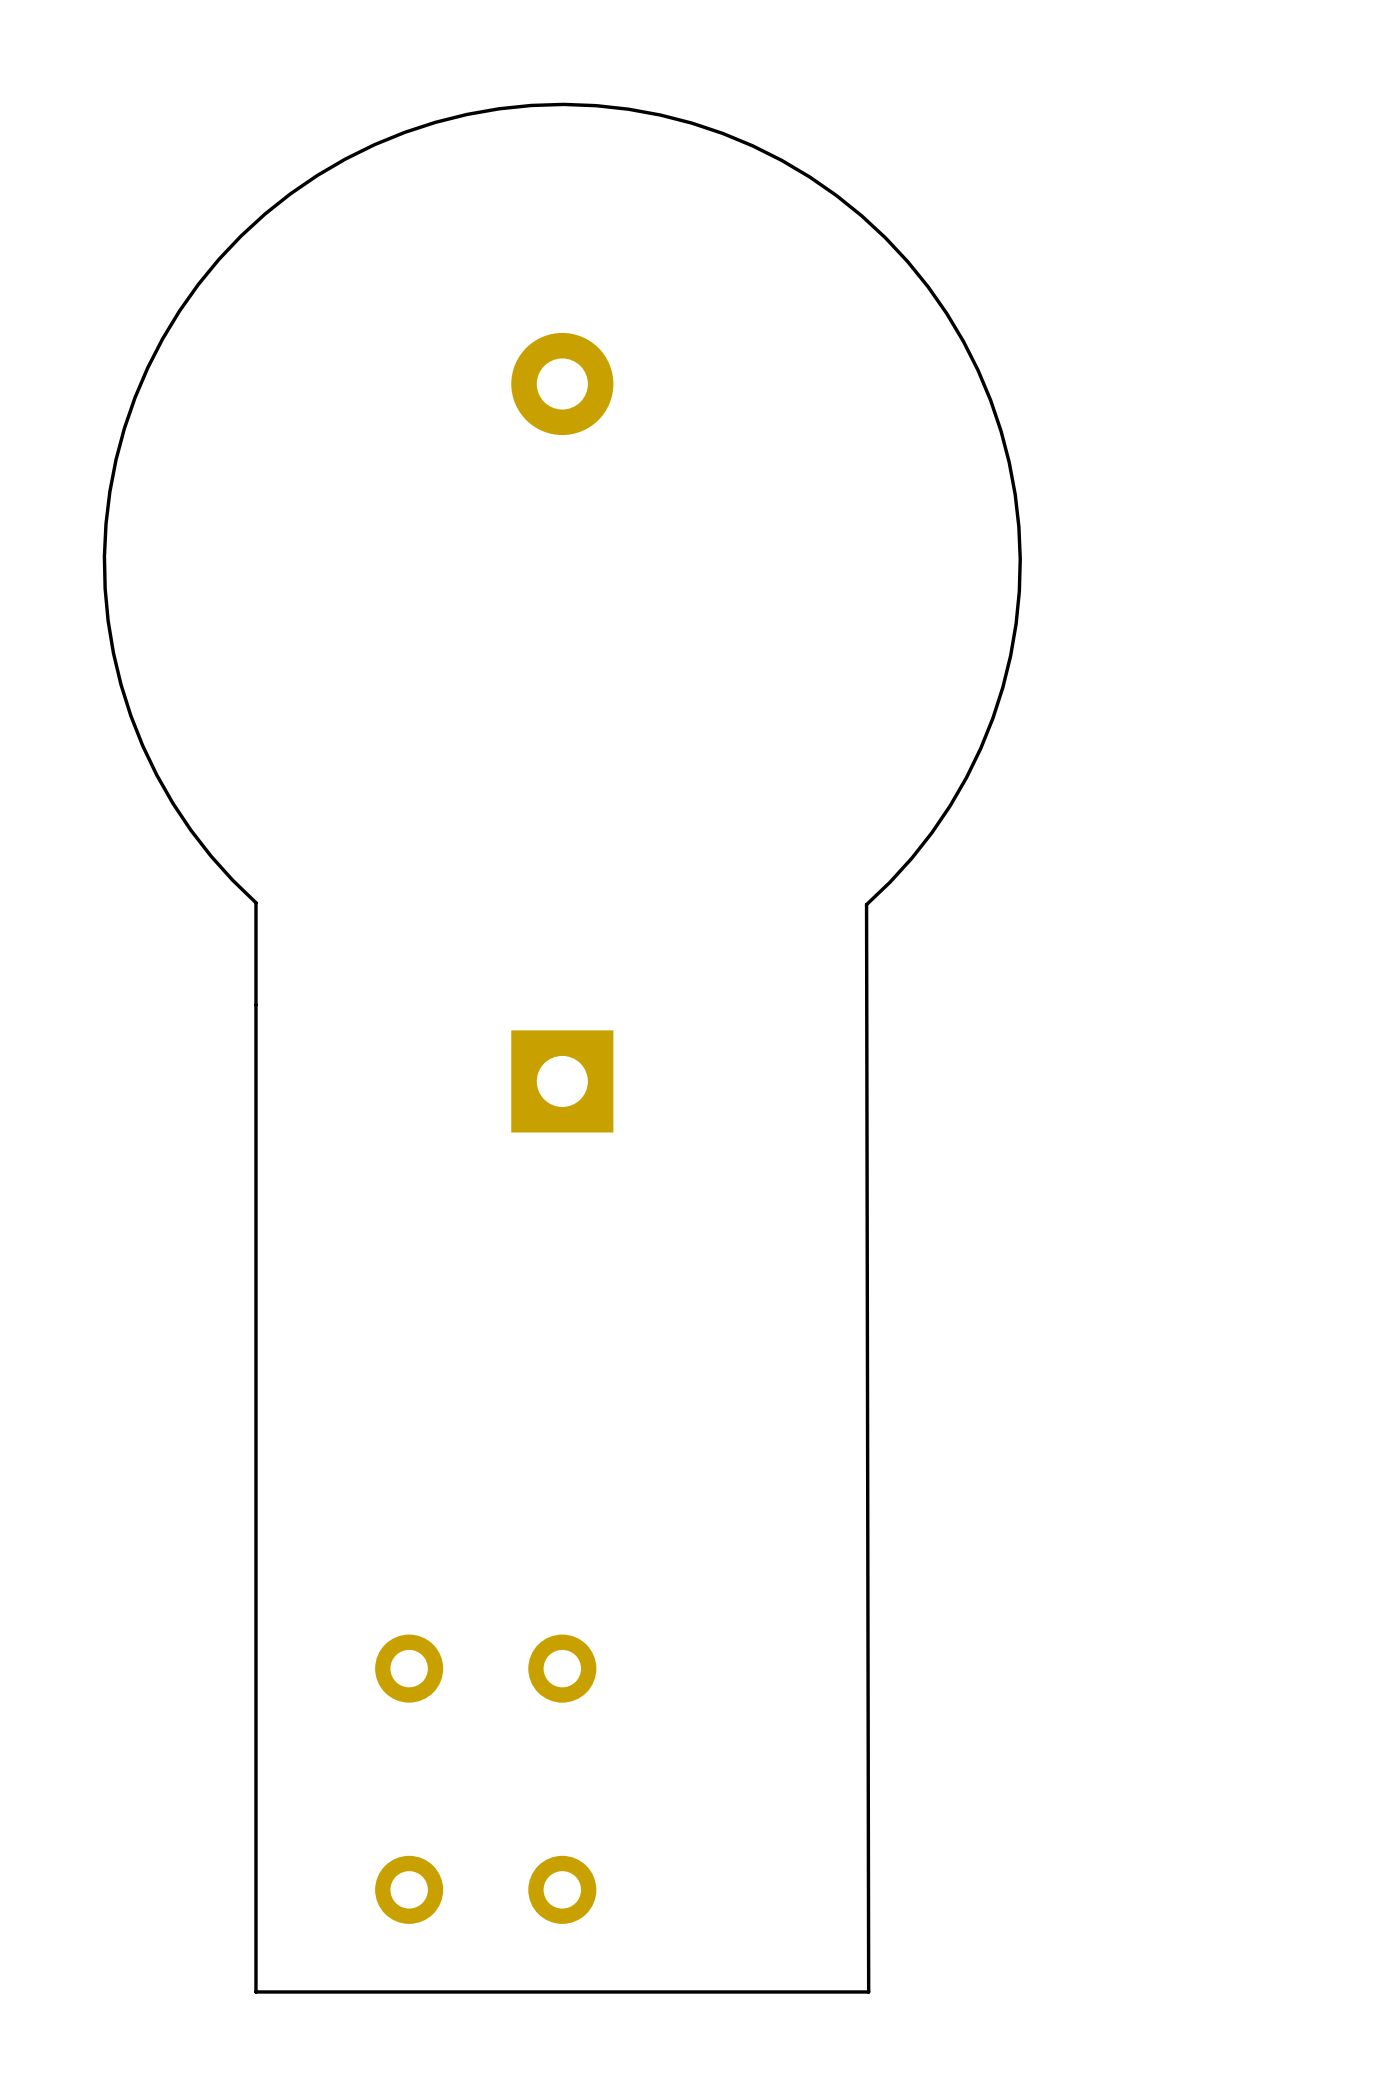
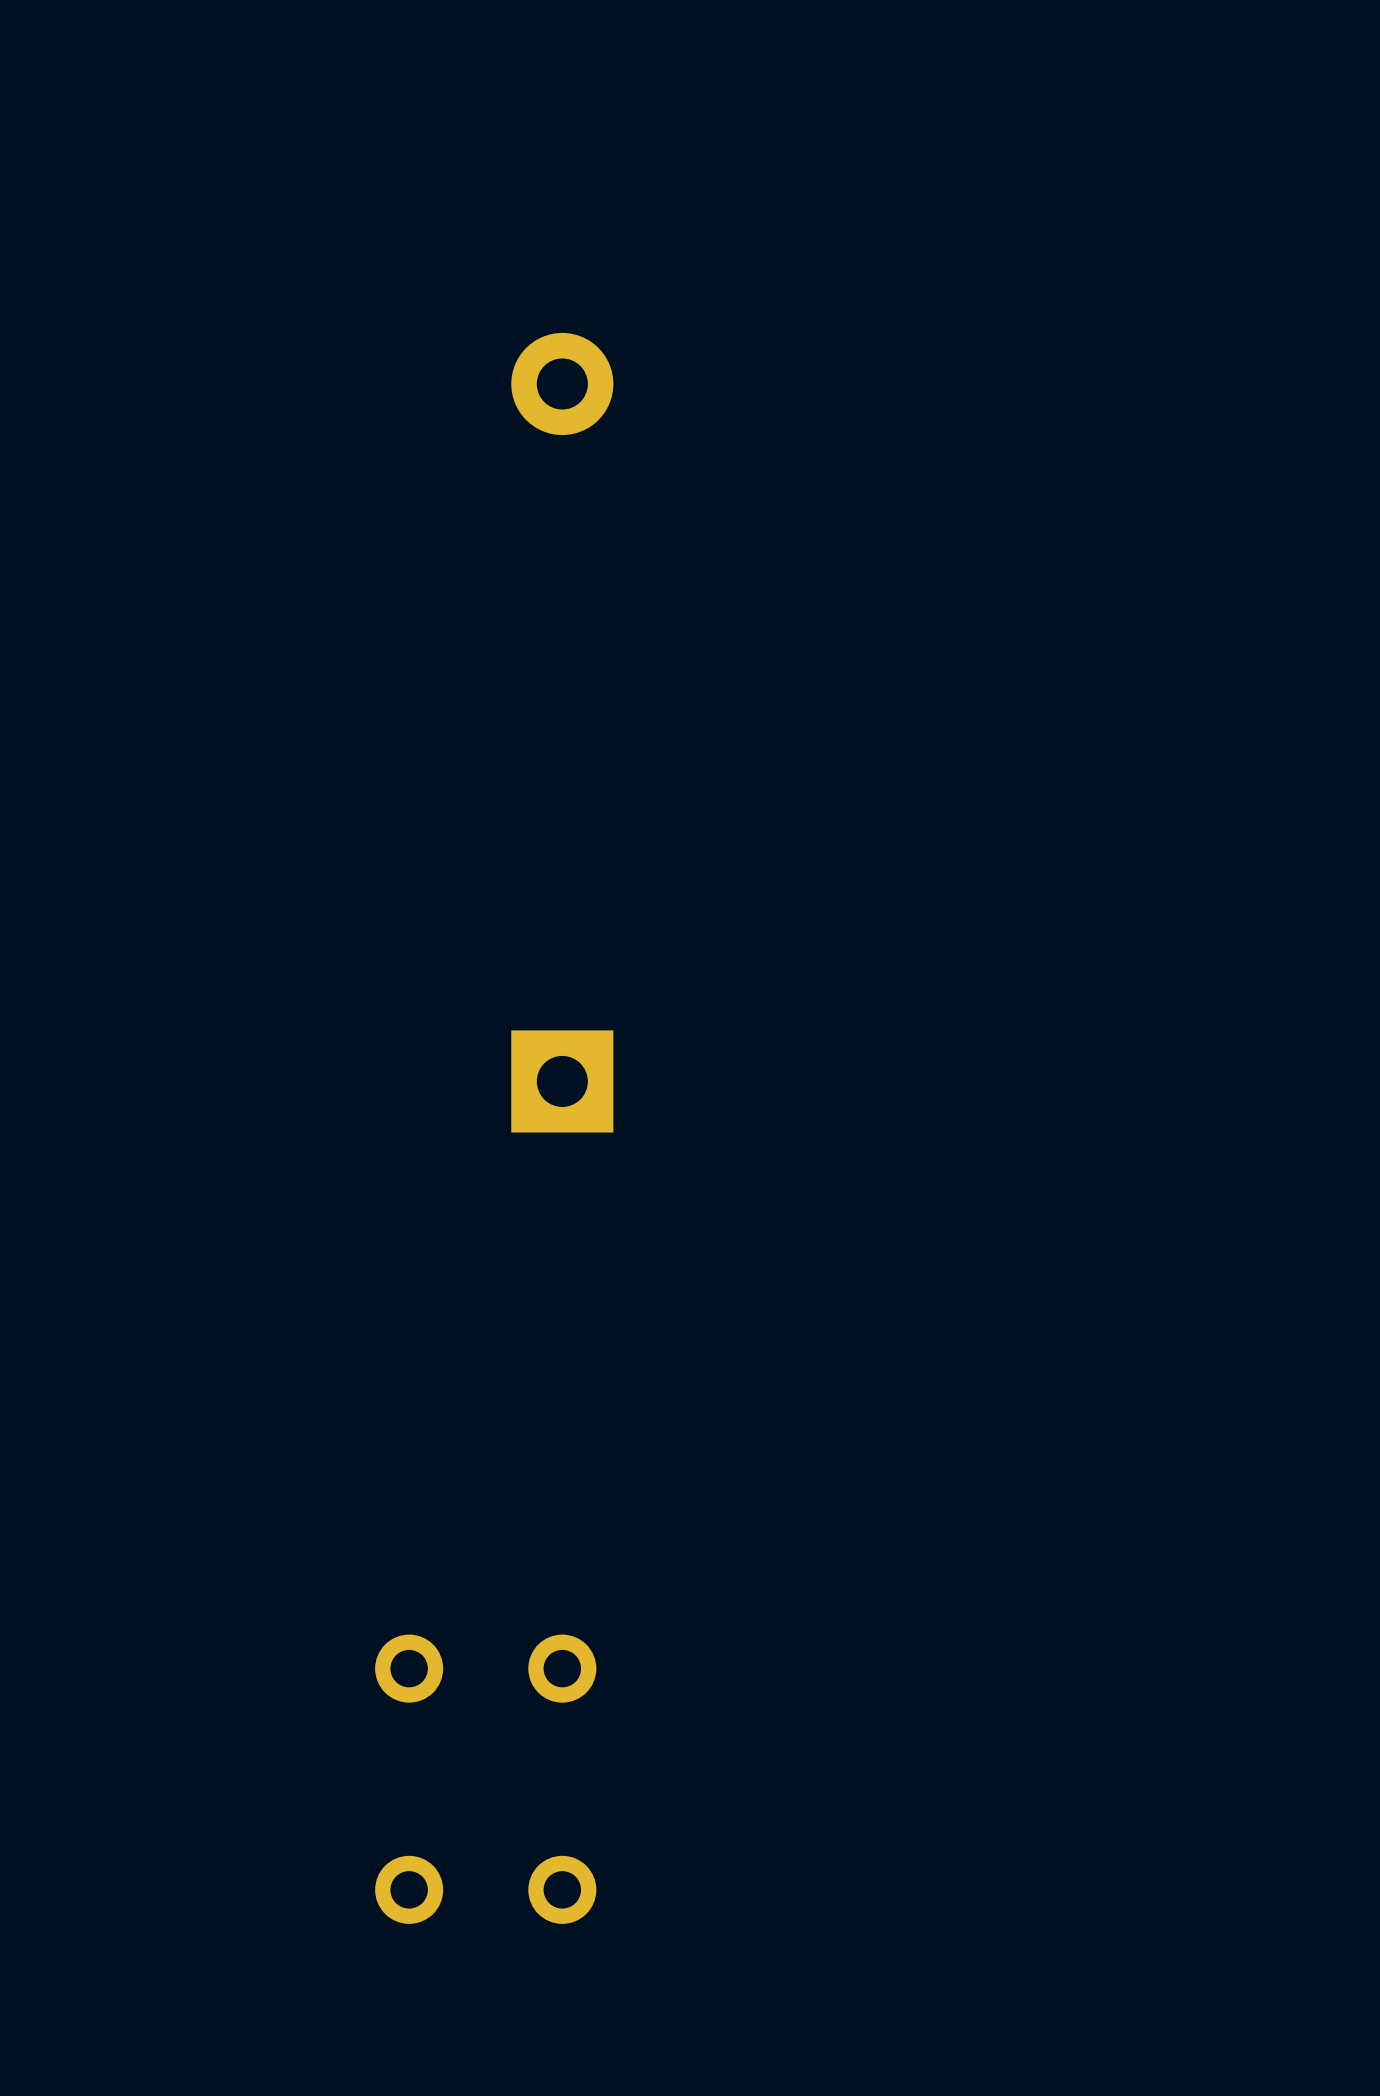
board edge: (255, 902) (255, 1991) (868, 1991) (866, 904) (911, 858) (931, 832) (950, 805) (980, 748) (1002, 687) (1010, 655) (1016, 623) (1020, 559) (1018, 526) (1009, 462) (990, 400) (978, 370) (946, 313) (928, 286) (885, 237) (861, 215) (809, 176) (781, 160) (722, 133) (691, 123) (628, 109) (596, 105) (531, 105) (498, 108) (435, 122) (404, 132) (345, 159) (317, 175) (265, 213) (218, 259) (198, 284) (162, 338) (135, 397) (124, 428) (109, 491) (106, 523) (105, 588) (113, 653) (130, 715) (142, 745) (172, 803) (190, 830) (210, 856) (255, 902) -> none

